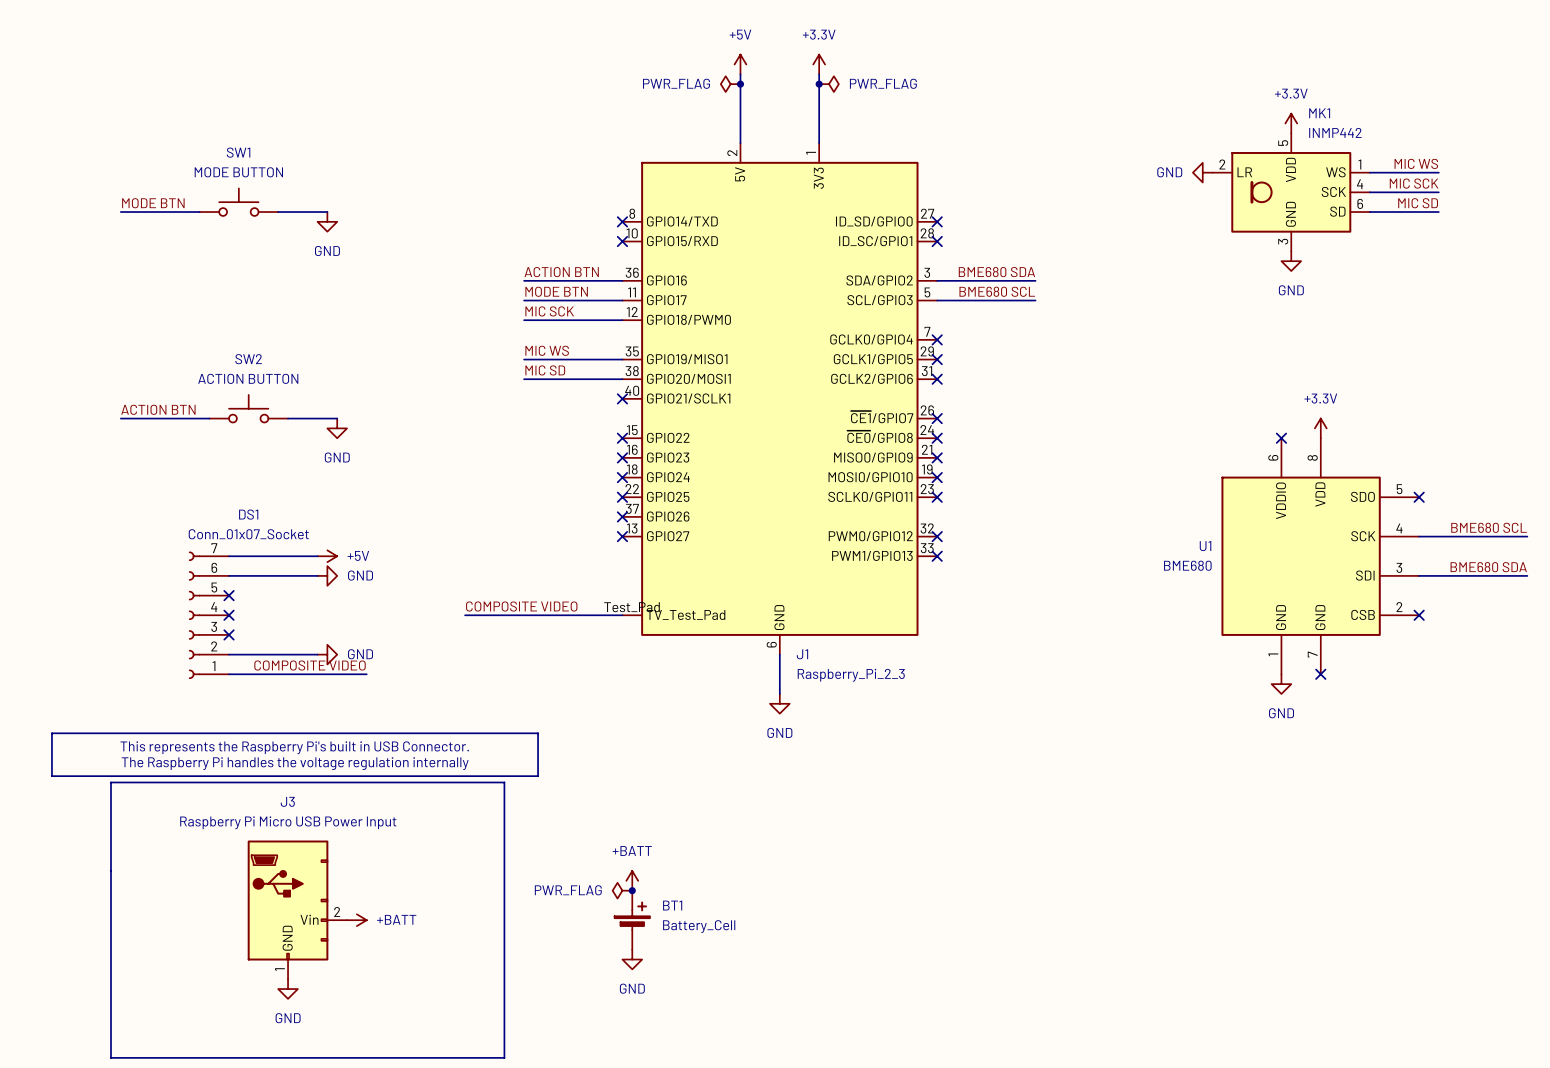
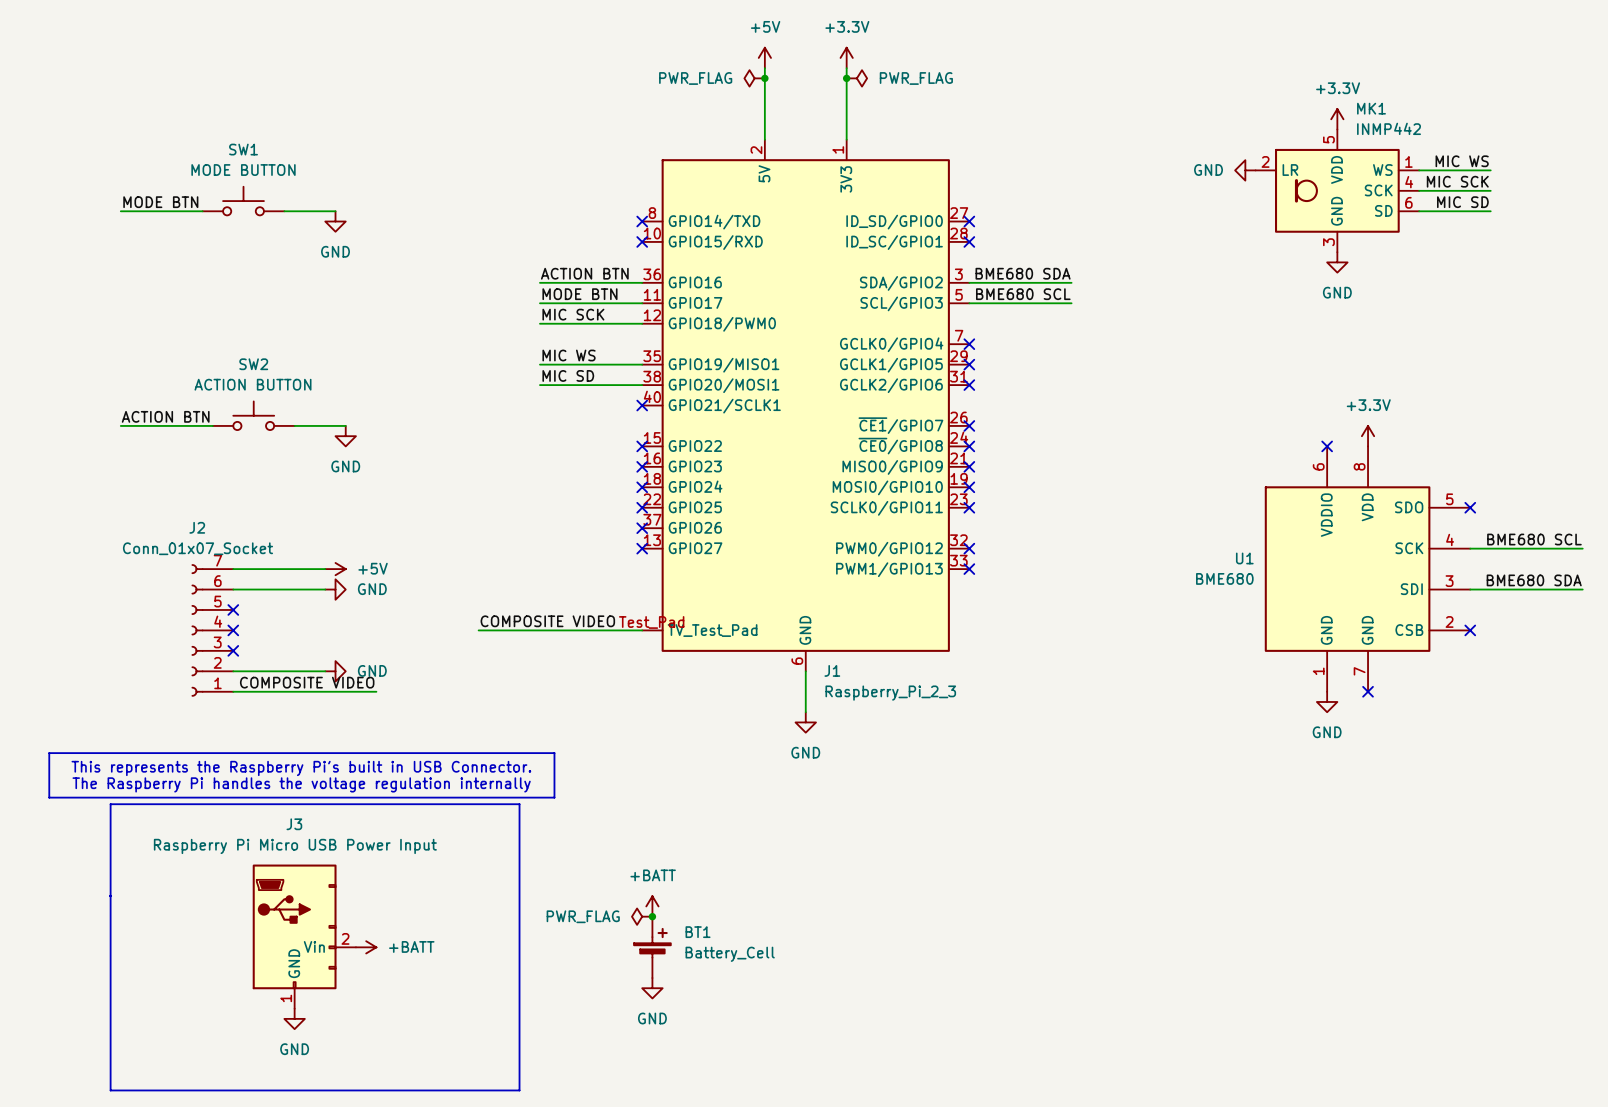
DS1 name: DS1 (248, 514) -> J2 (197, 527)
DS1 value position: Conn_01x07_Socket (248, 534) -> Conn_01x07_Socket (197, 548)

